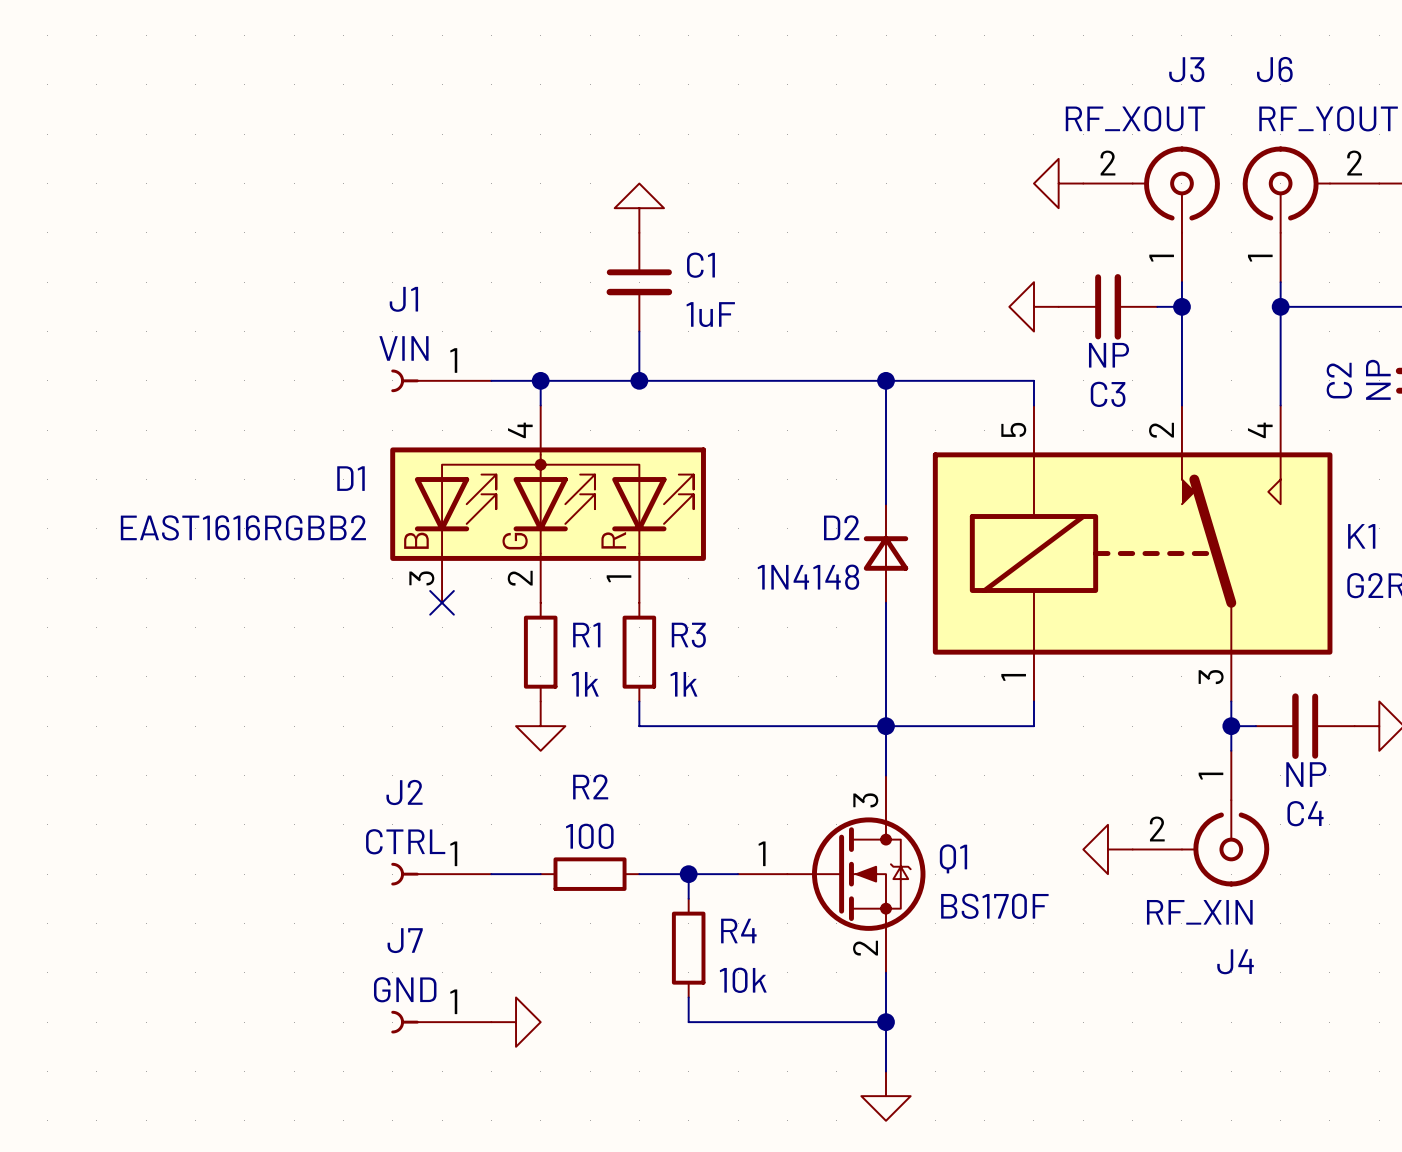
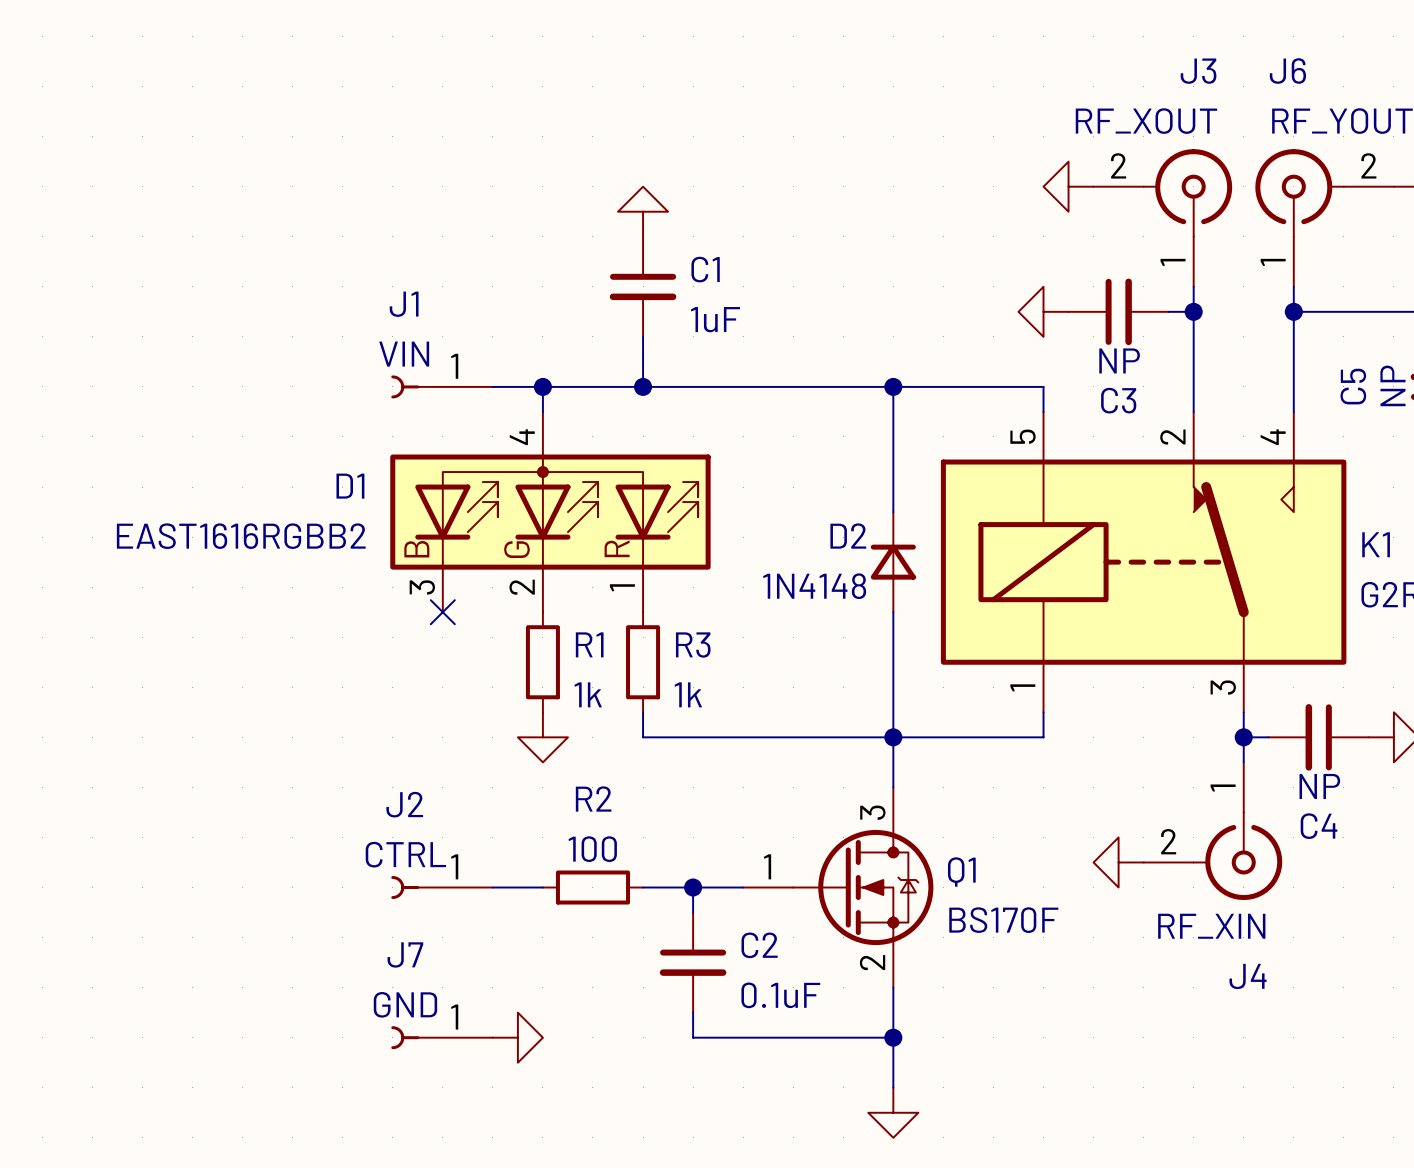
C2 name: C2 (1339, 380) -> C5 (1353, 386)
R4: 10k (688, 948) -> none
C2: none -> 0.1uF (693, 962)

